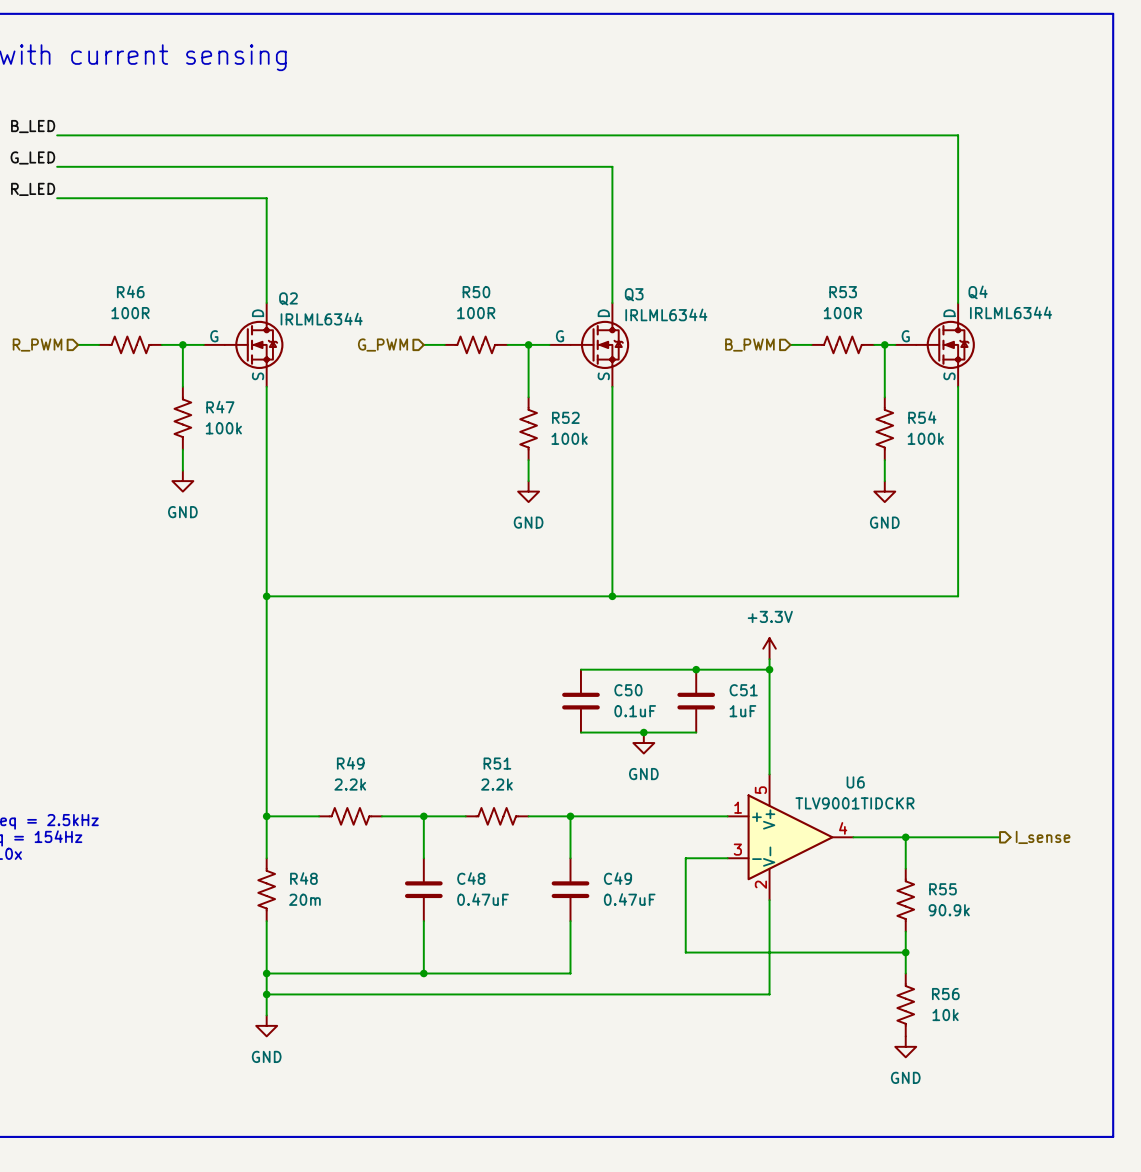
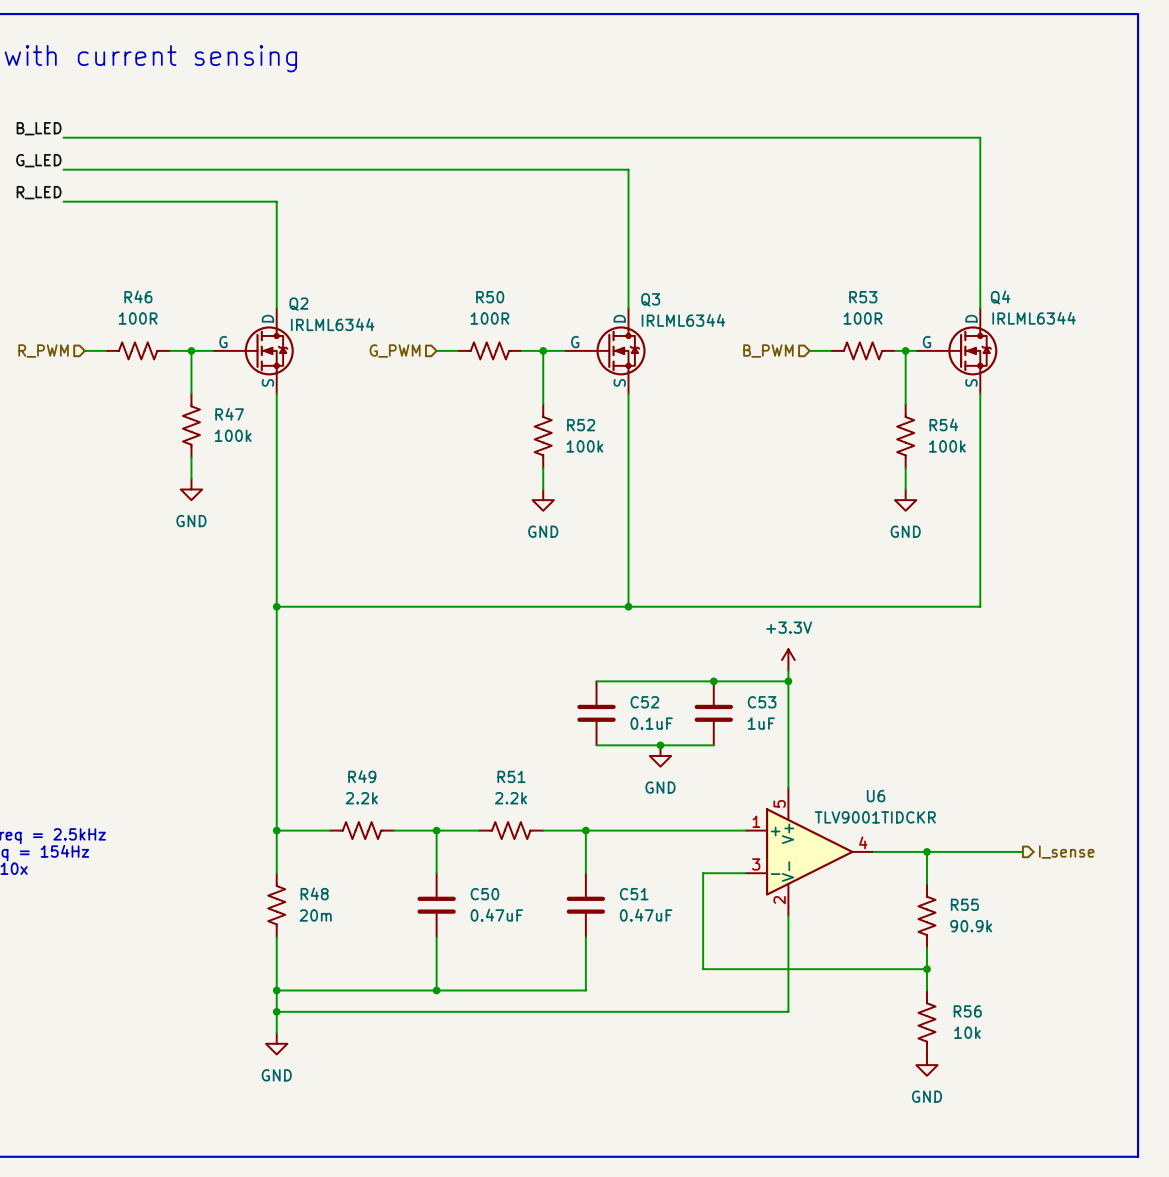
C50 name: C50 (628, 690) -> C52 (644, 702)
C51 name: C51 (743, 690) -> C53 (762, 702)
C48 name: C48 (471, 878) -> C50 (484, 894)
C49 name: C49 (617, 878) -> C51 (634, 894)

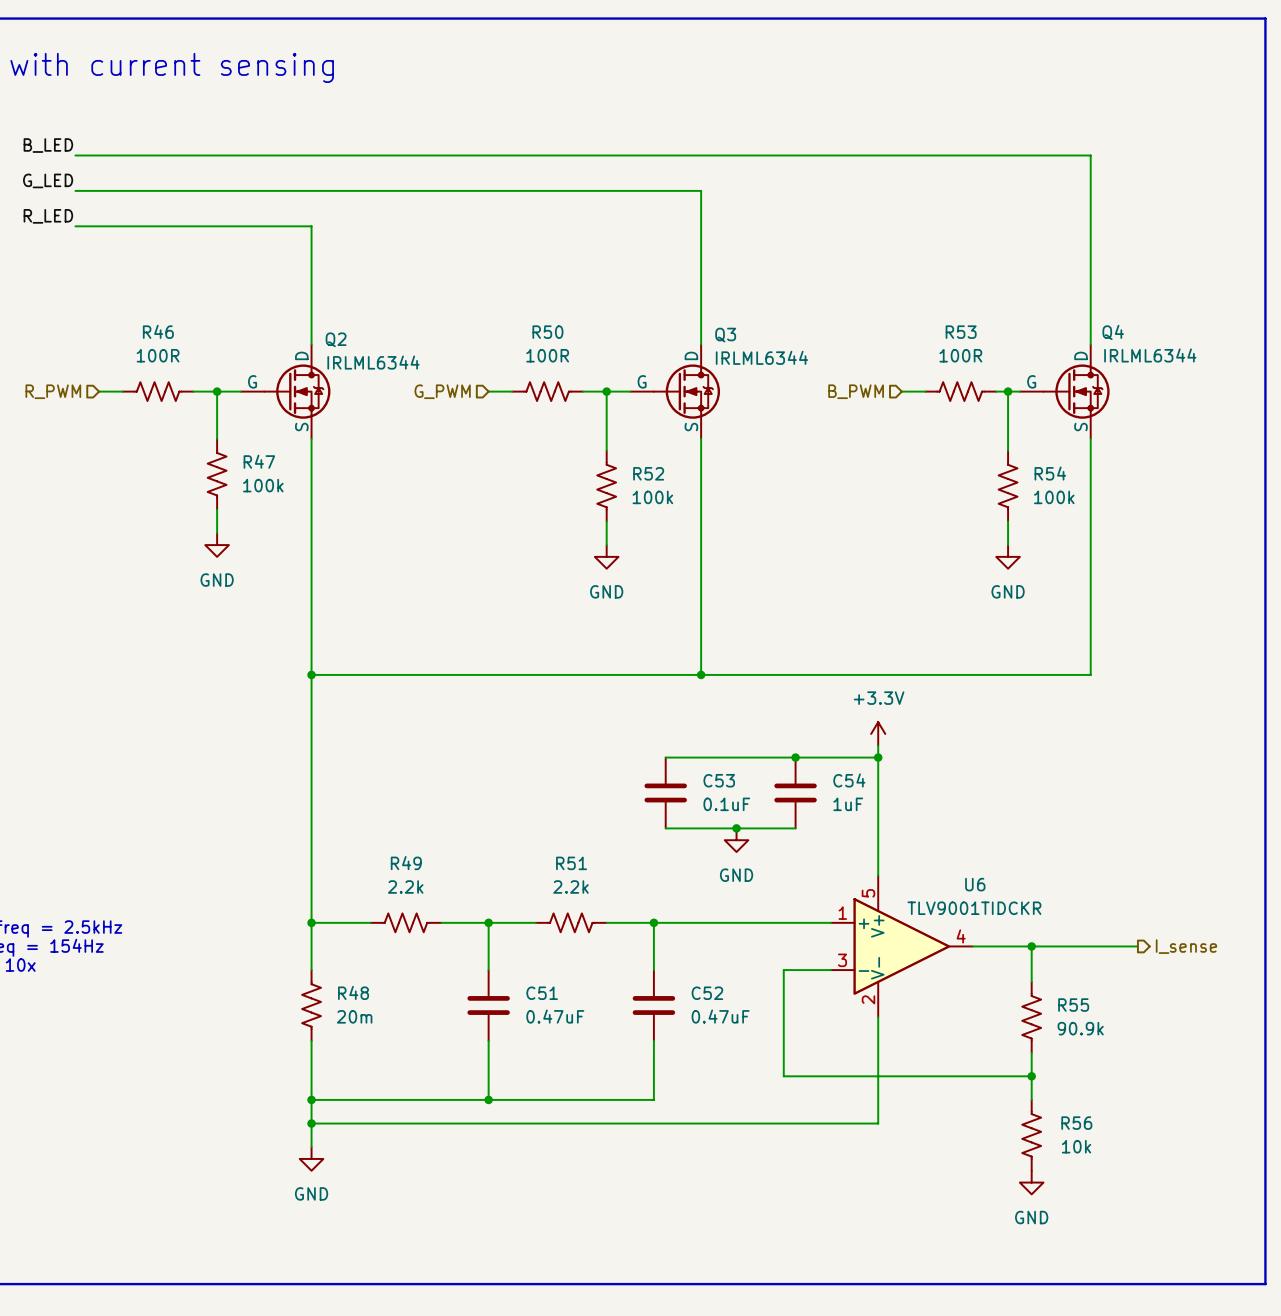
C52 name: C52 (644, 702) -> C53 (719, 780)
C53 name: C53 (762, 702) -> C54 (849, 780)
C50 name: C50 (484, 894) -> C51 (542, 993)
C51 name: C51 (634, 894) -> C52 (707, 993)

